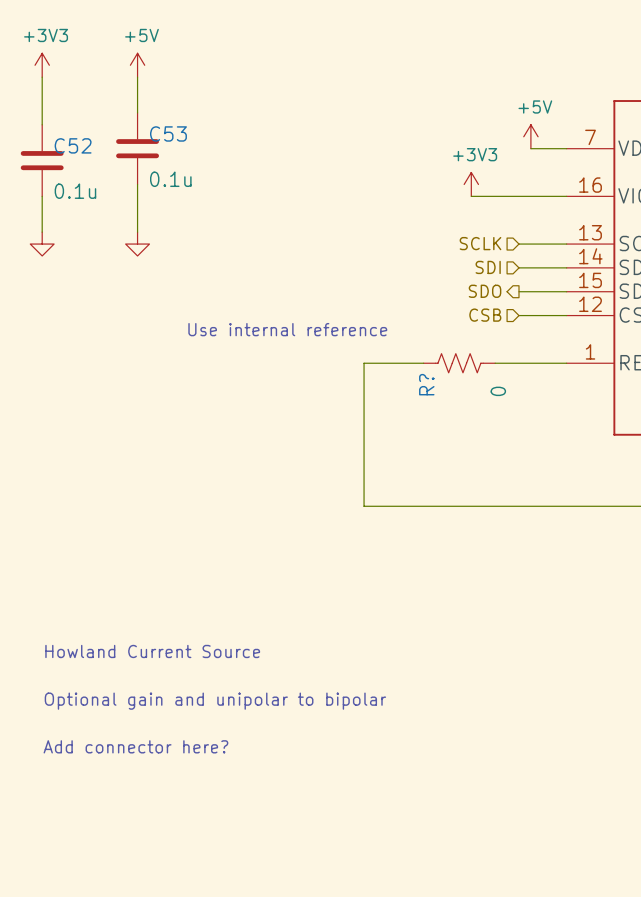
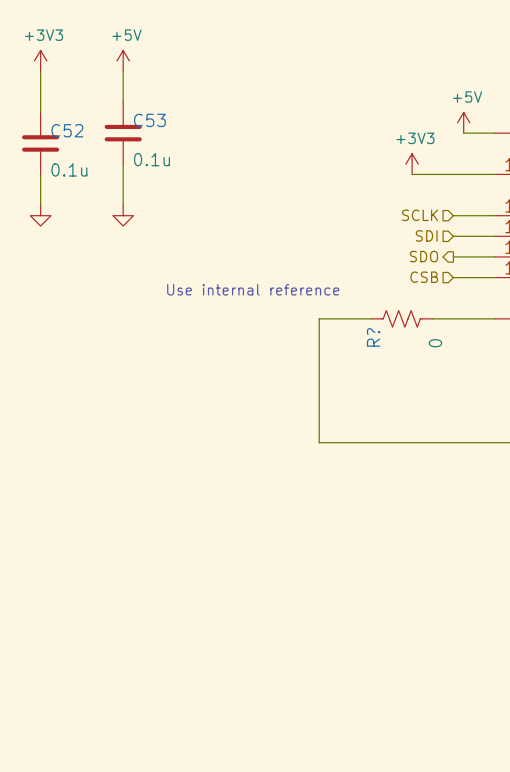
text: Howland Current Source (152, 651) -> none
text: Optional gain and unipolar to bipolar (215, 701) -> none
text: Add connector here? (135, 746) -> none

